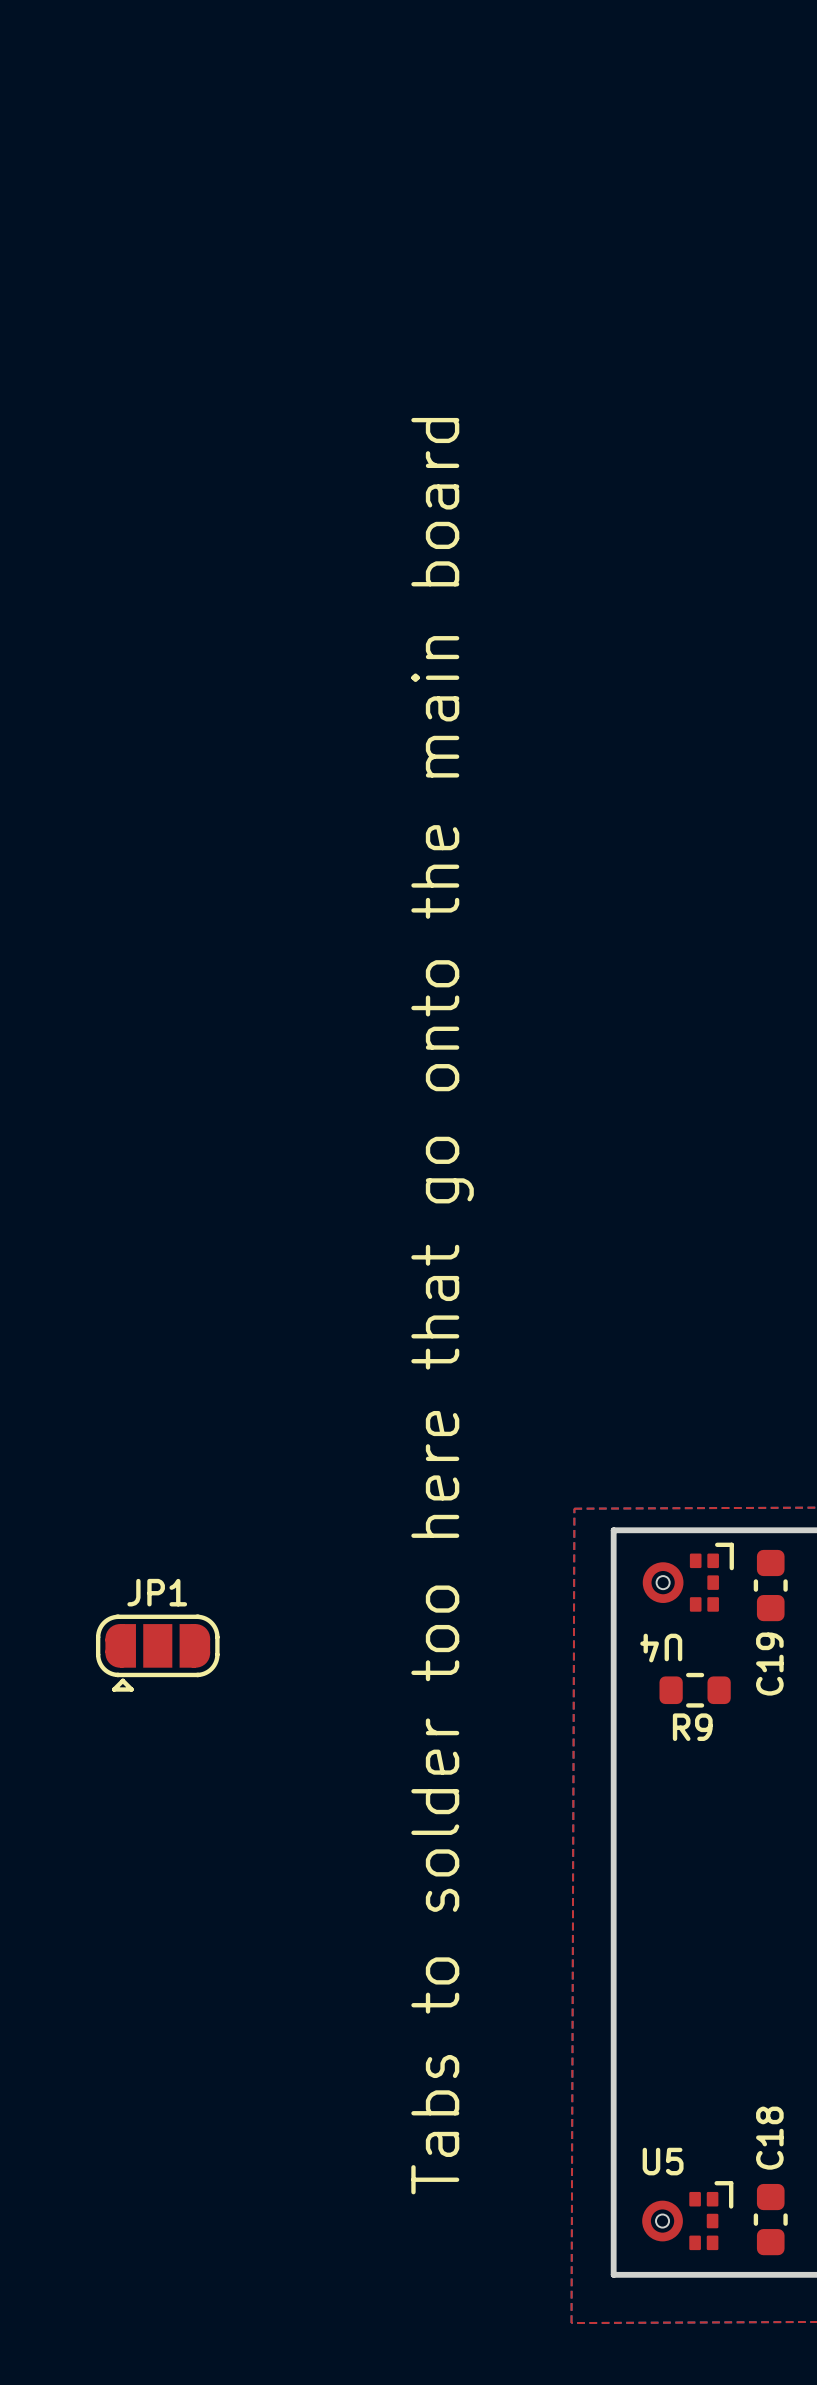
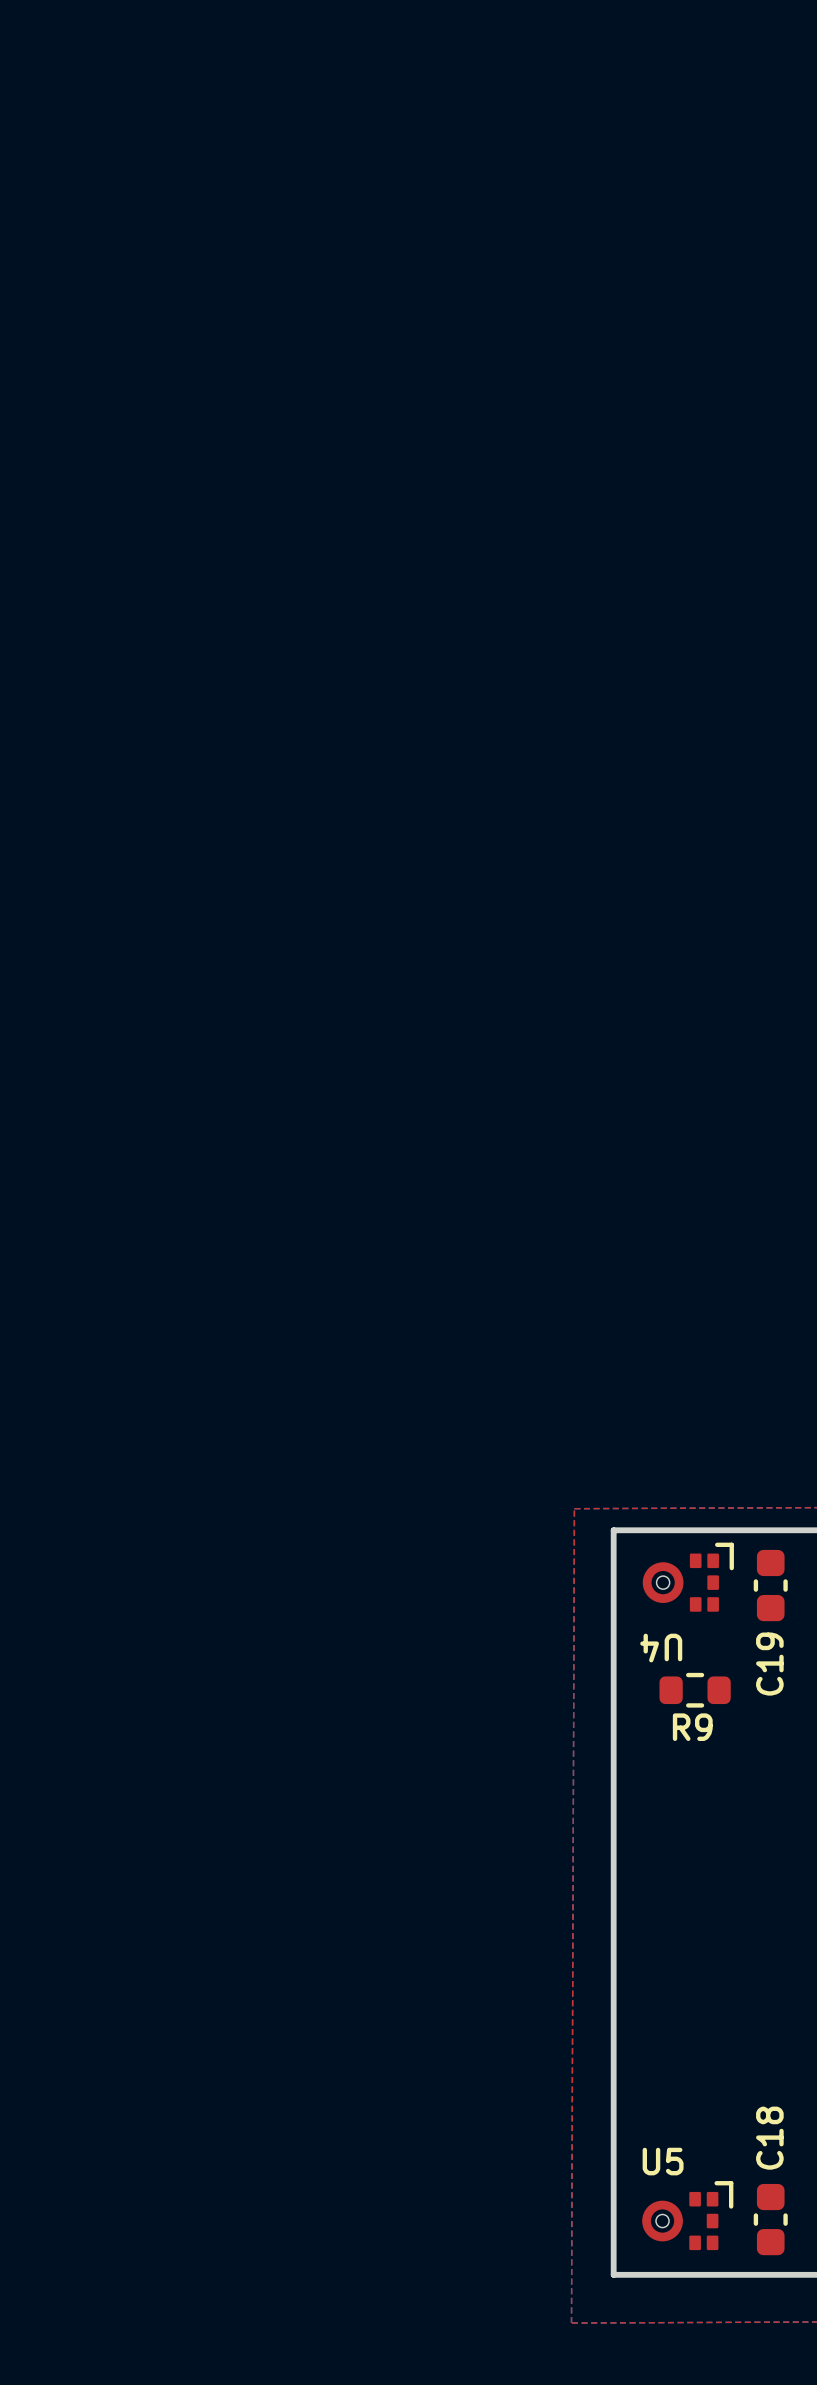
text: Tabs to solder too here that go onto the main board (442, 1306) -> none
JP1: (157, 1653) -> none

